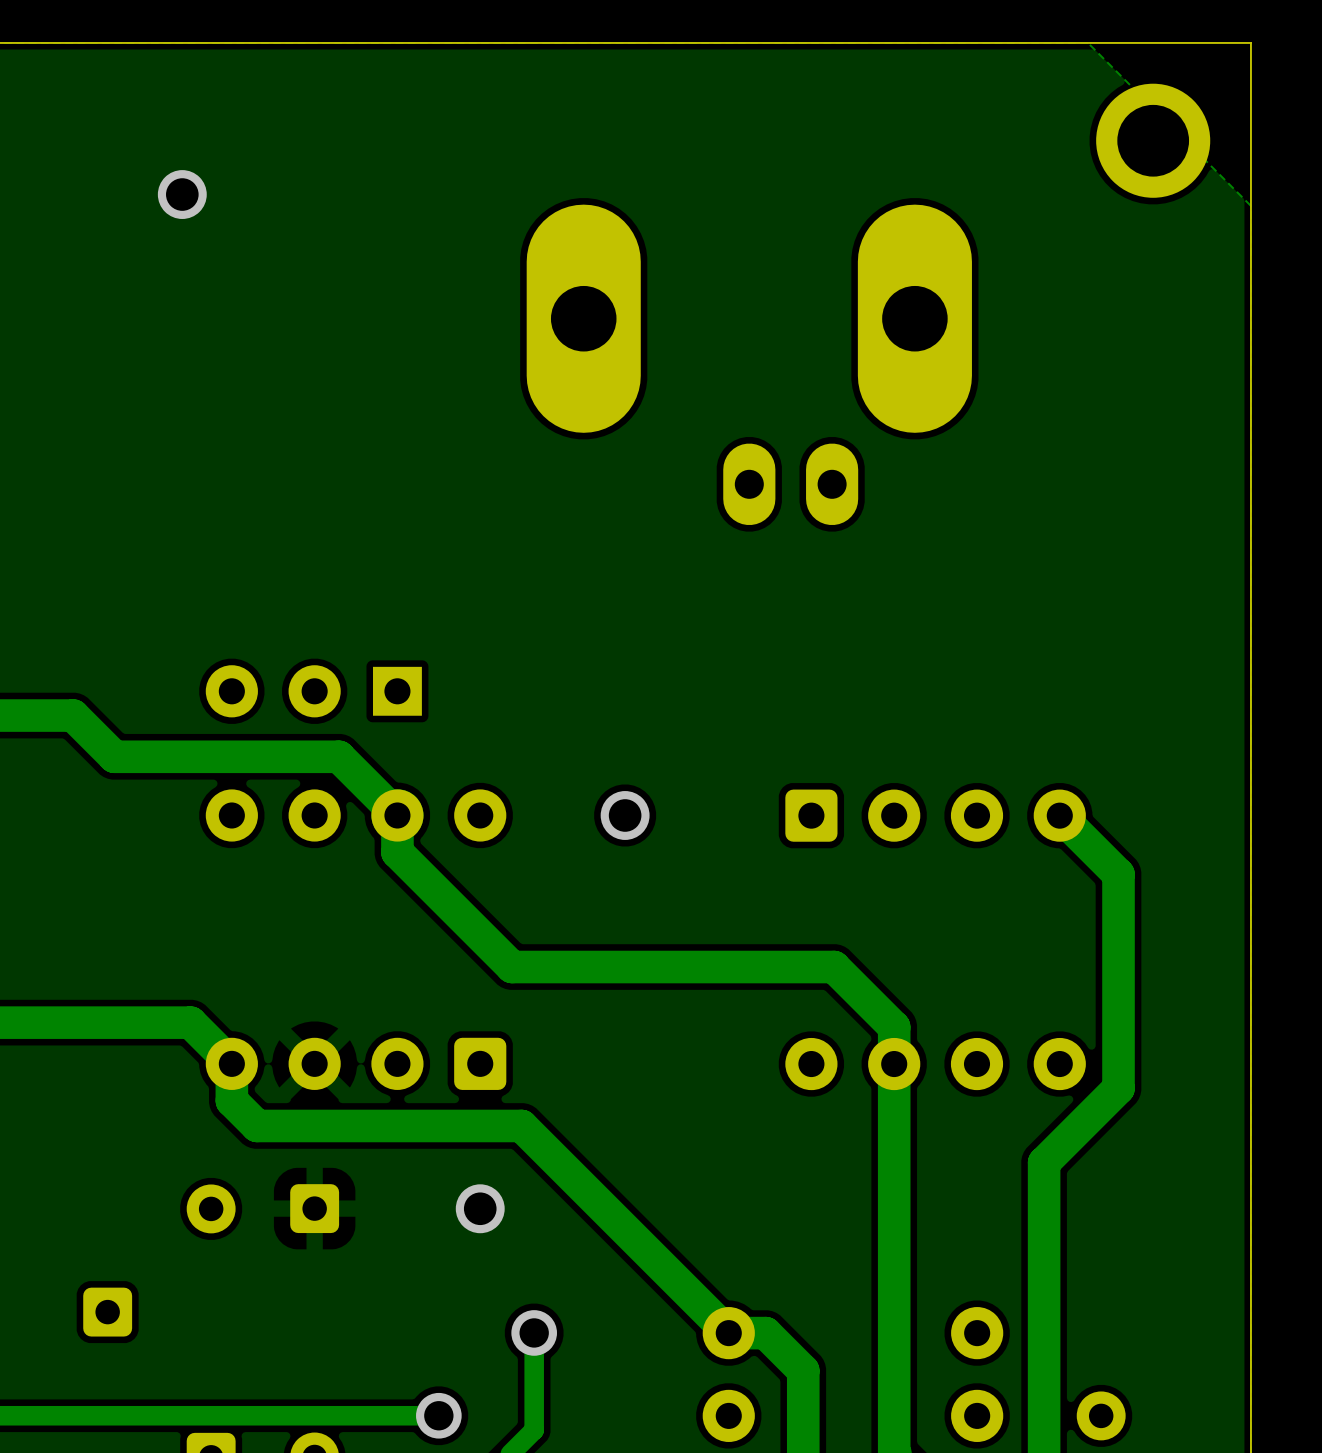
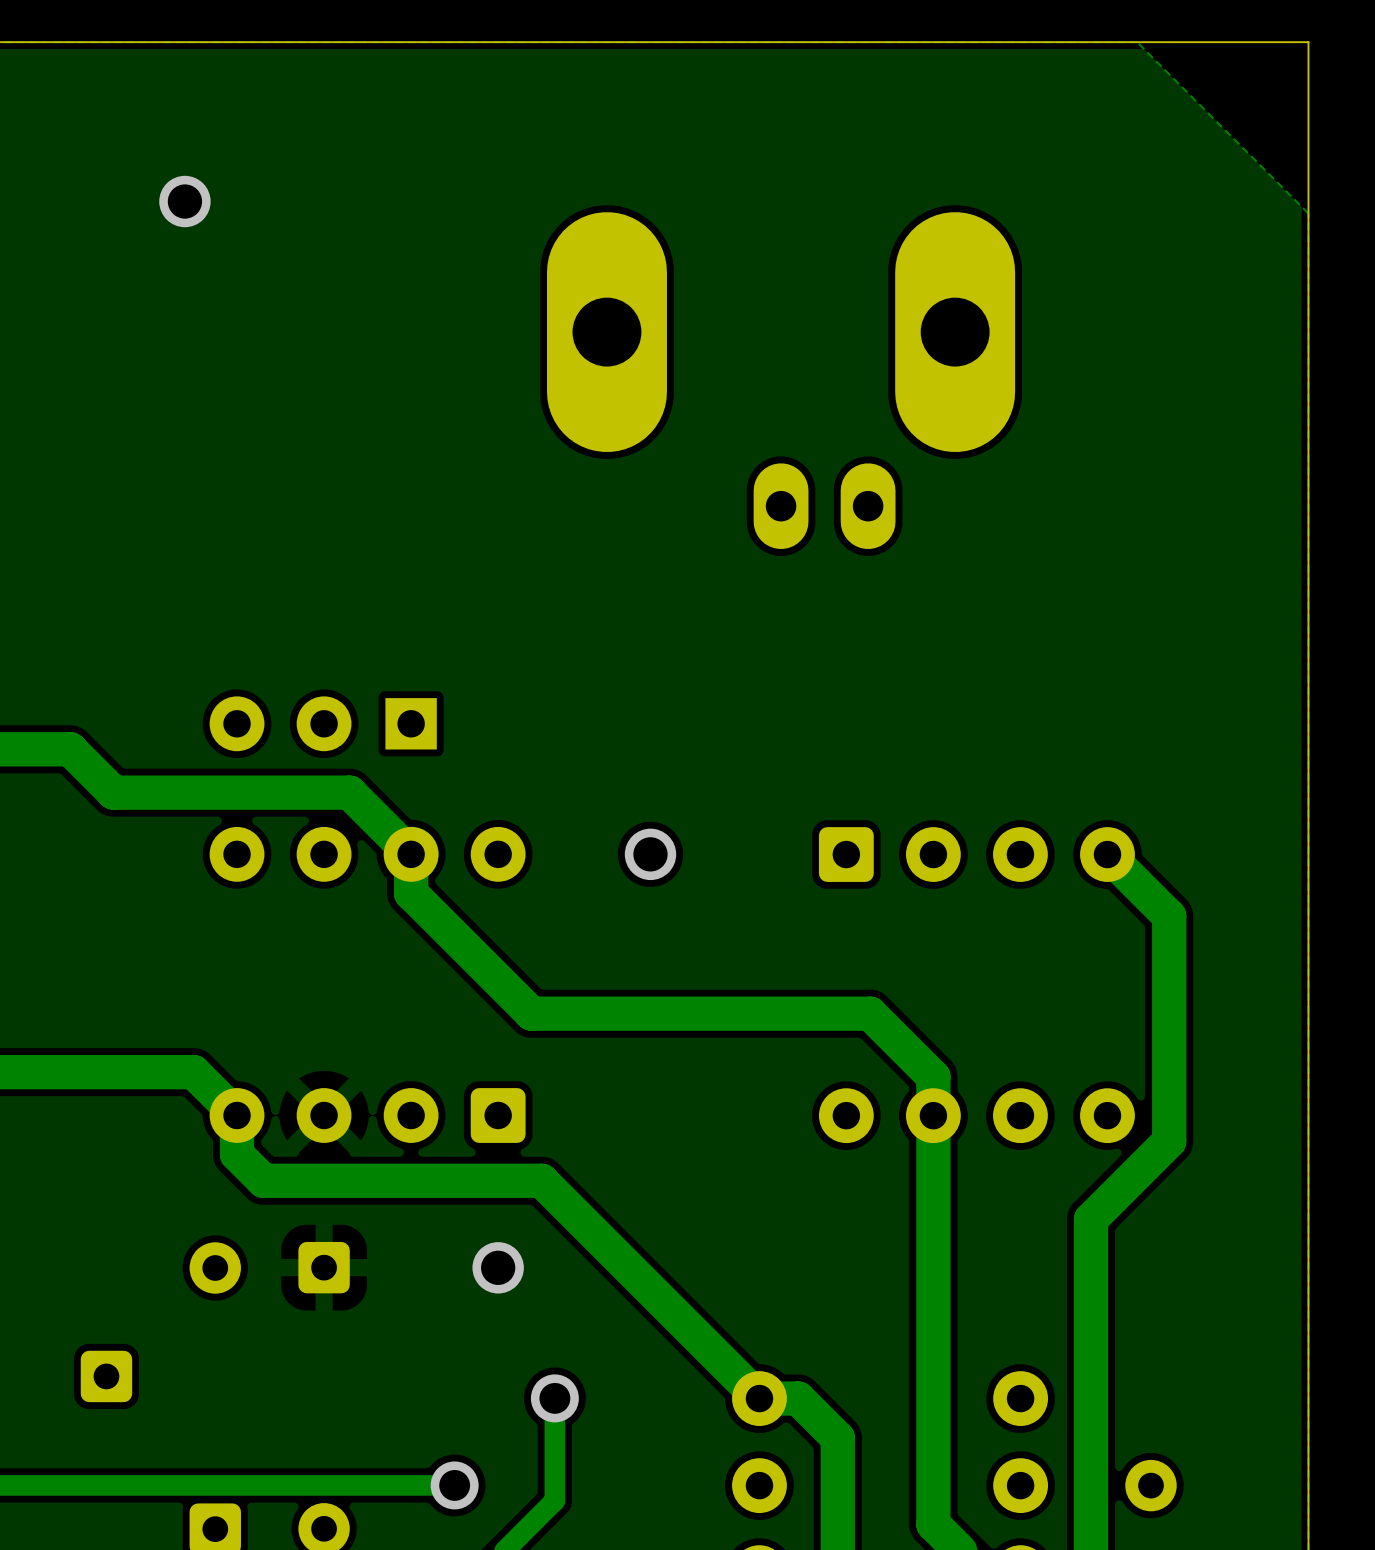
part: (1153, 140) -> none

